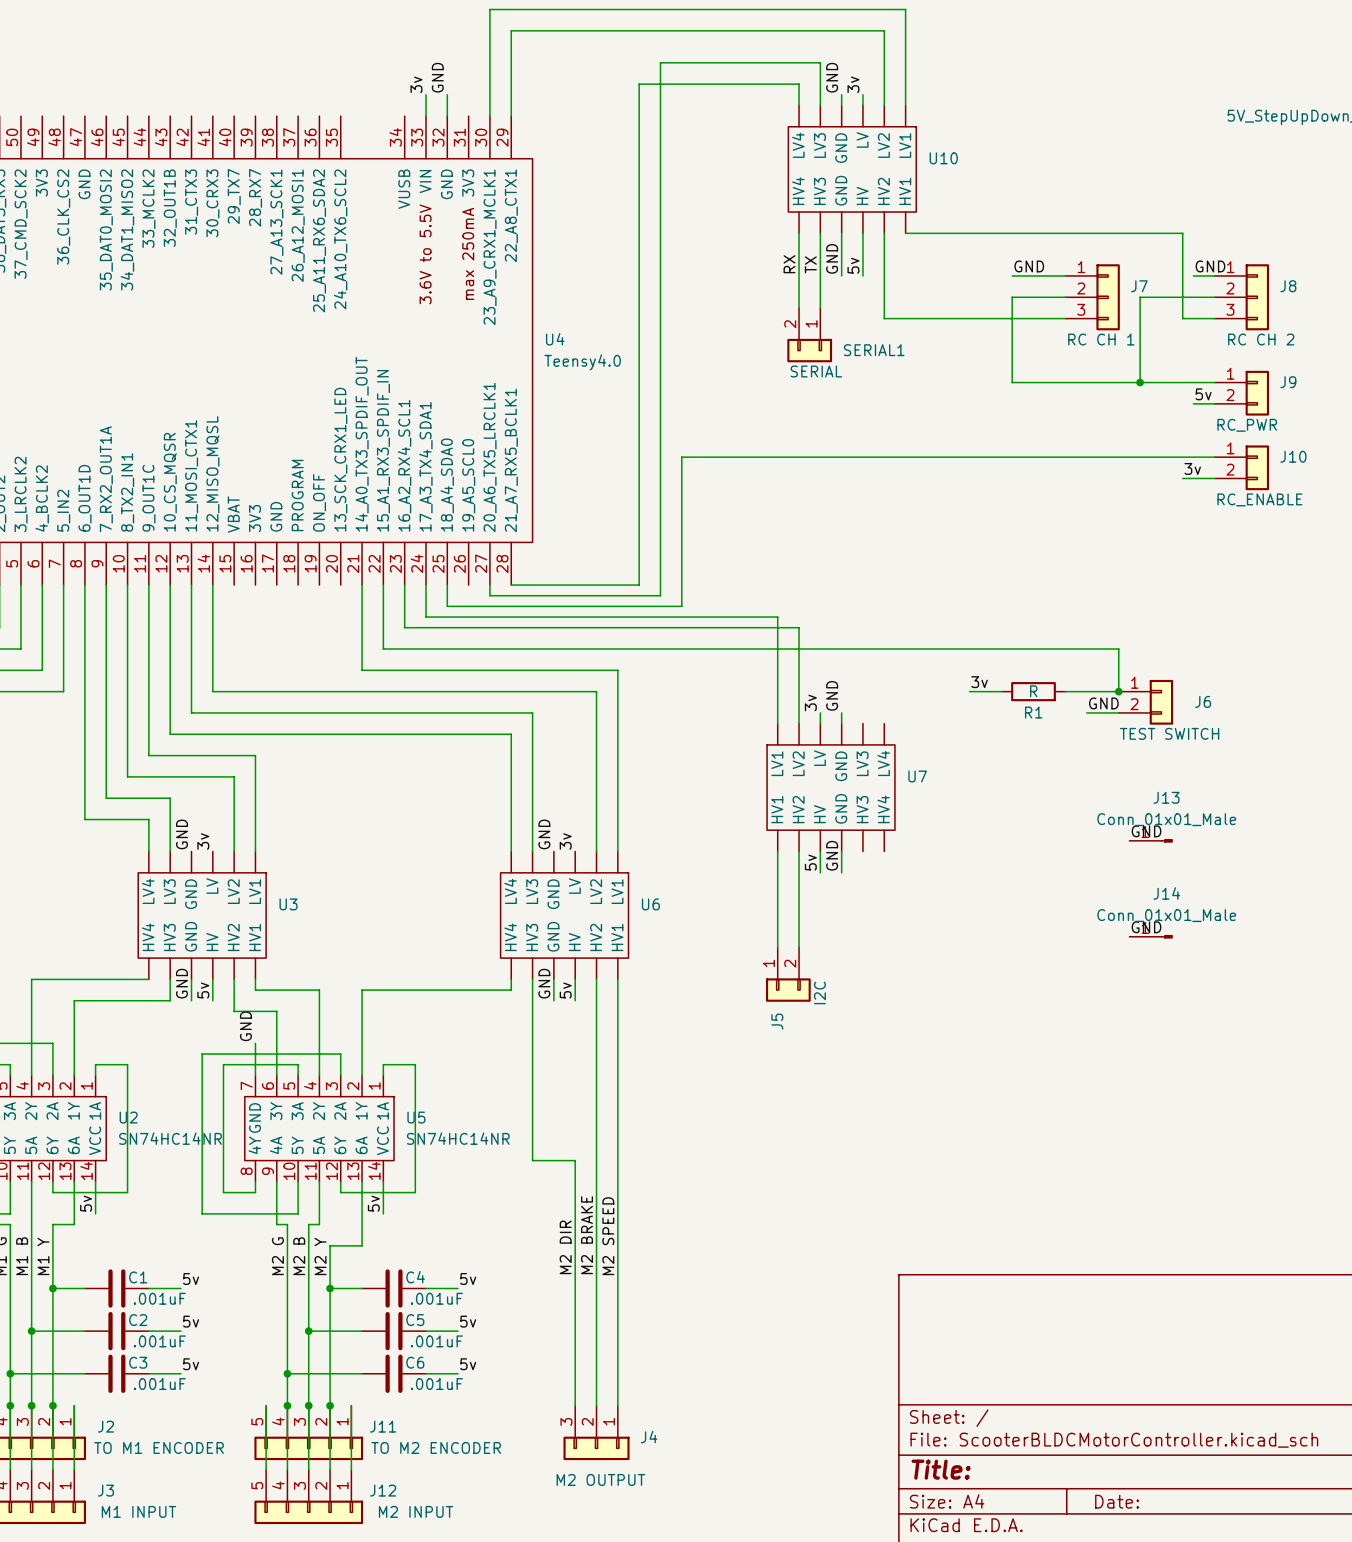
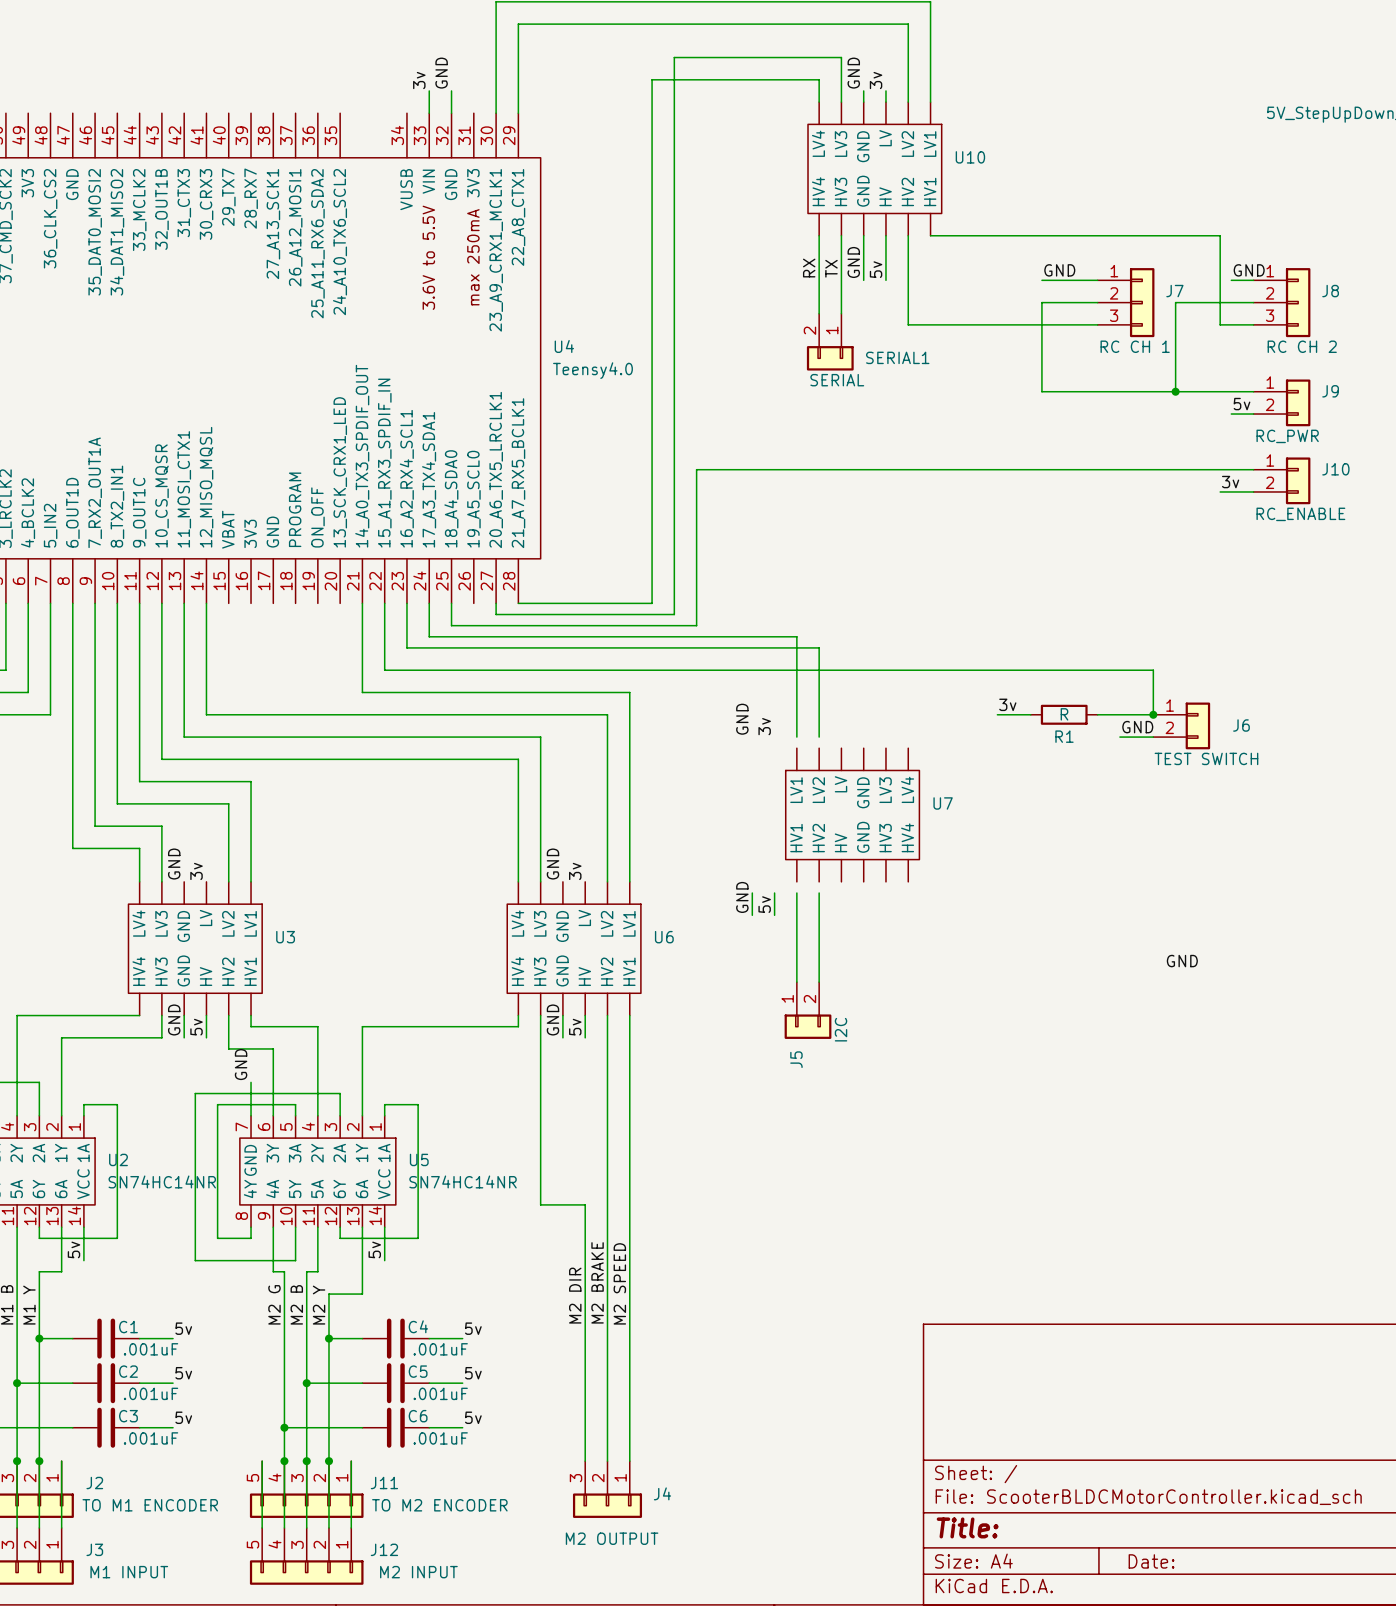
label: none -> GND (742, 719)
label: GND (832, 695) -> none
label position: 3v (810, 702) -> 3v (764, 726)
wire: (777, 712) (777, 723) -> none
wire: (799, 712) (799, 723) -> none
wire: (820, 712) (820, 723) -> none
wire: (841, 712) (841, 723) -> none
label: GND (1146, 831) -> none
J13: Conn_01x01_Male (1151, 840) -> none
wire: (777, 851) (777, 862) -> none
wire: (799, 851) (799, 862) -> none
wire: (820, 851) (820, 872) -> (752, 893) (752, 915)
wire: (841, 851) (841, 872) -> (774, 893) (774, 915)
label: GND (832, 855) -> none
label position: 5v (810, 862) -> 5v (764, 904)
label: none -> GND (742, 897)
J14: Conn_01x01_Male (1151, 936) -> none

